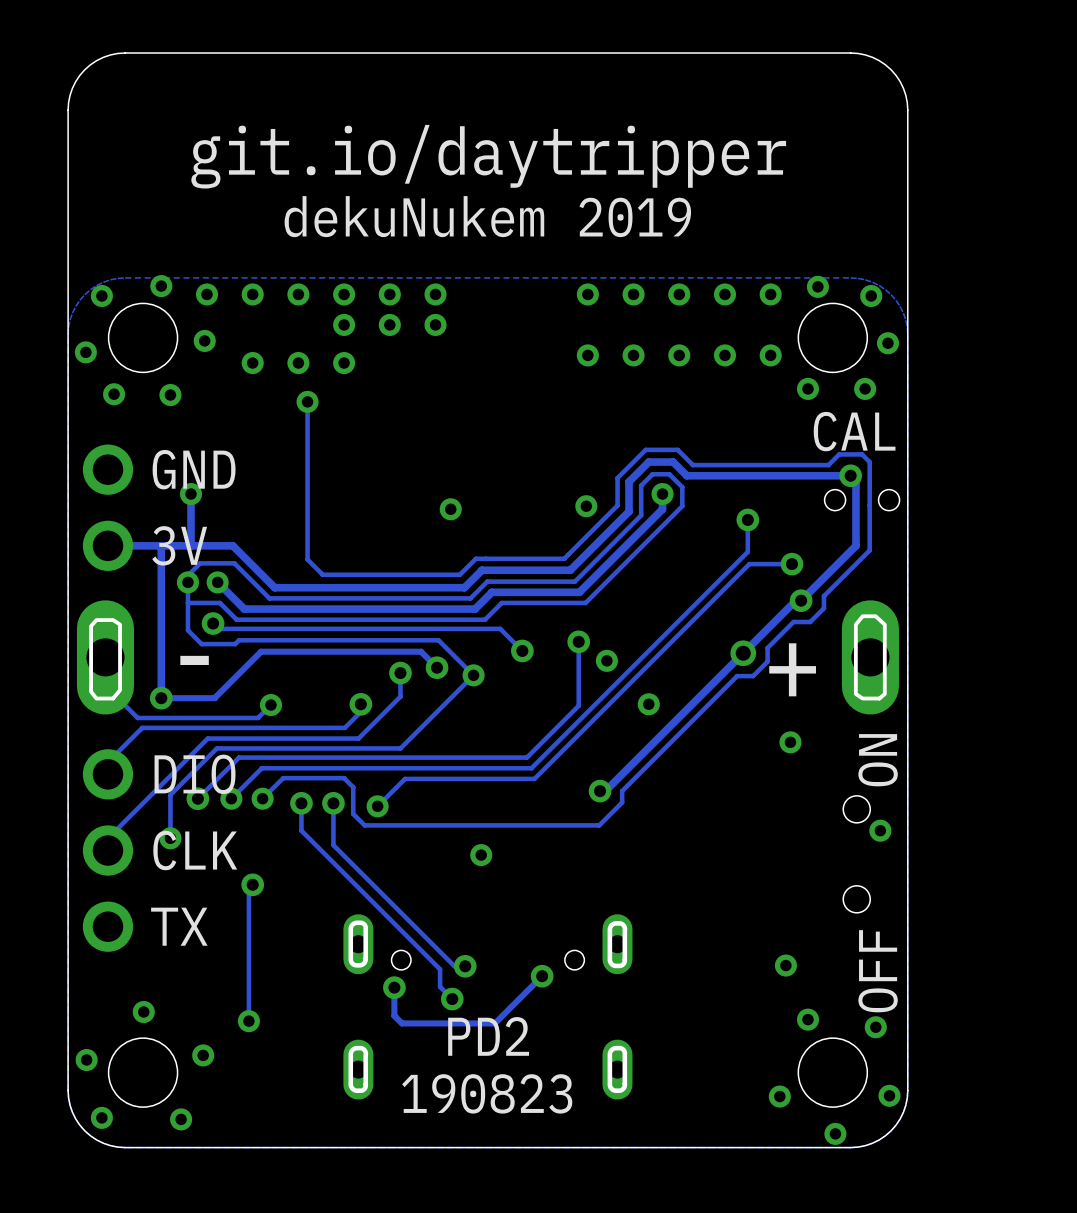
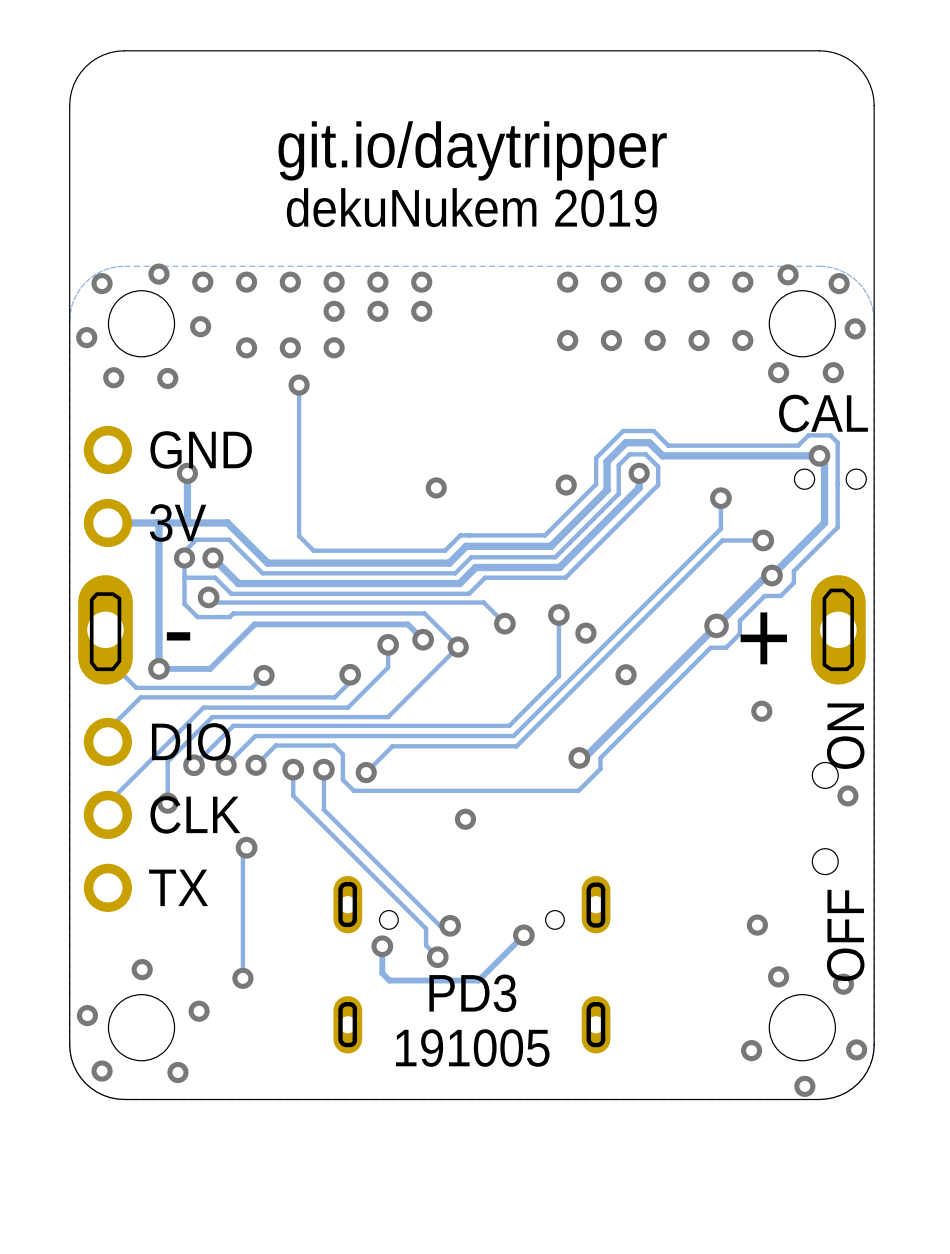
text: PD2 (488, 1036) -> PD3 (472, 993)
text: 190823 (487, 1093) -> 191005 (472, 1048)

